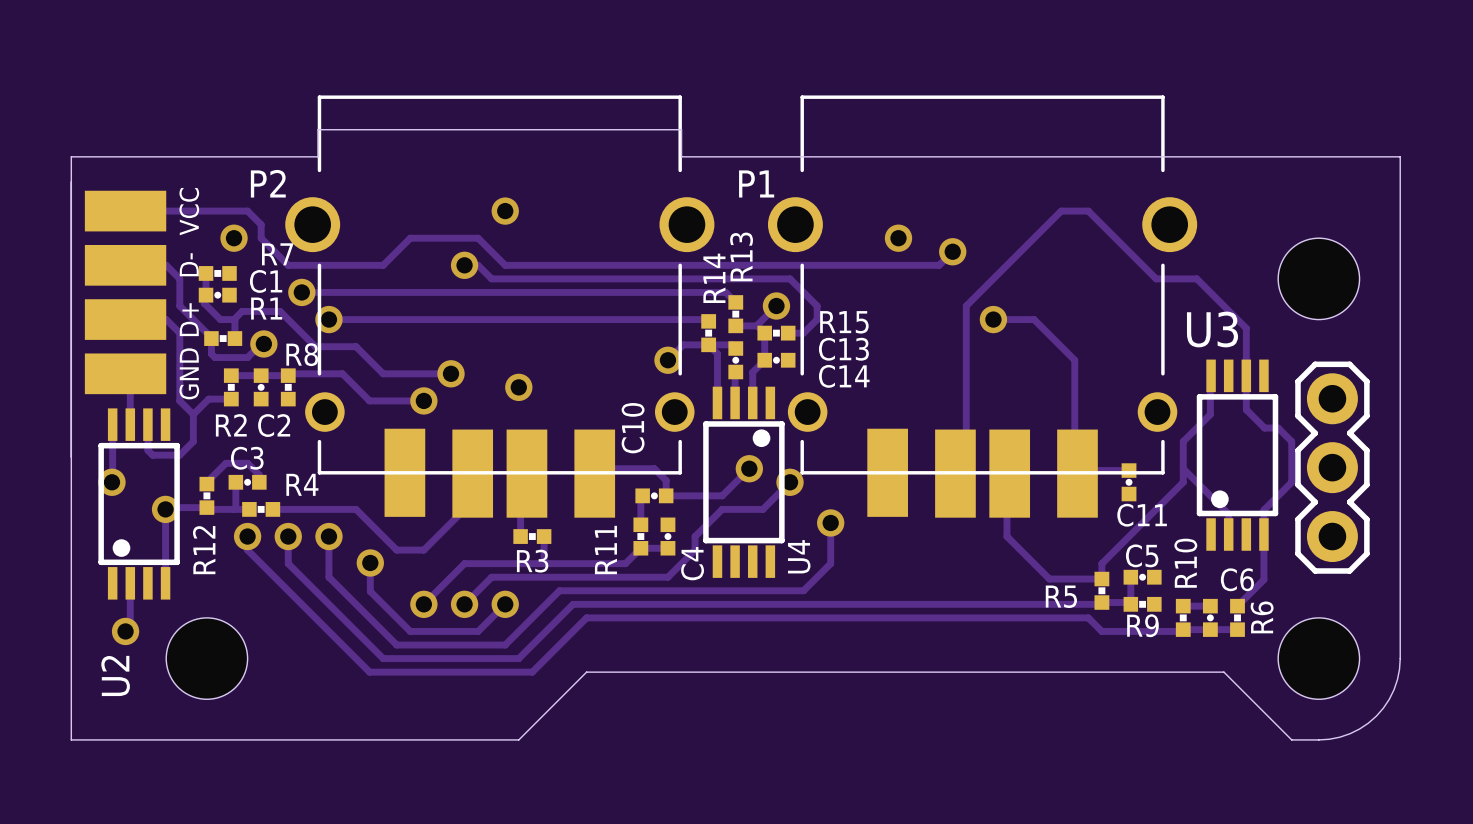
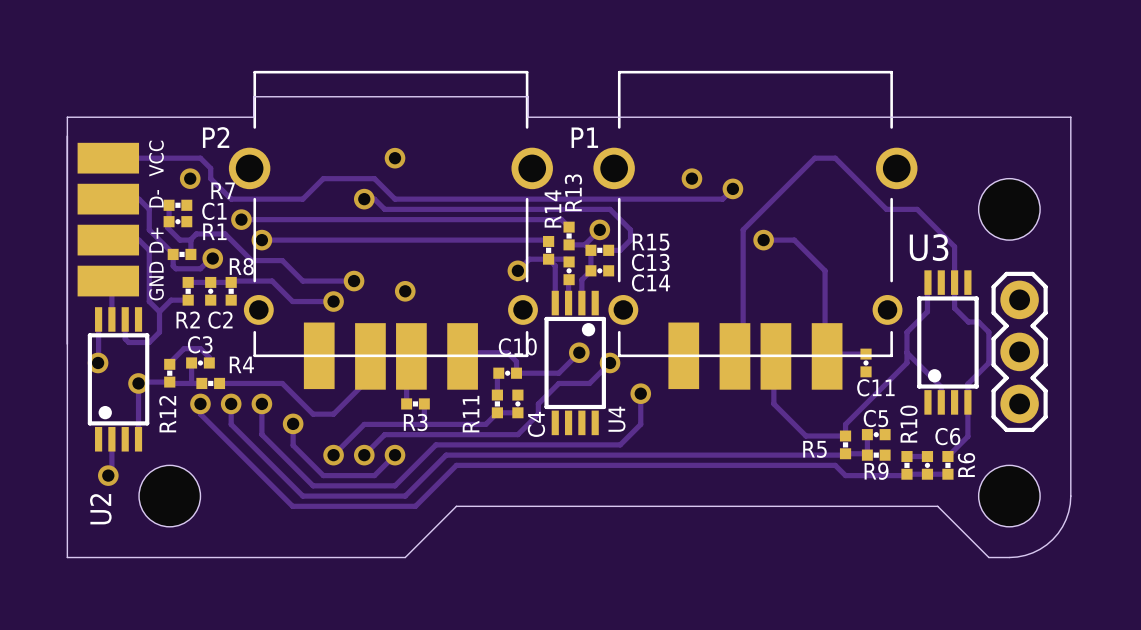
C10 name rotation: 0° (633, 428) -> 90° clockwise (517, 346)

